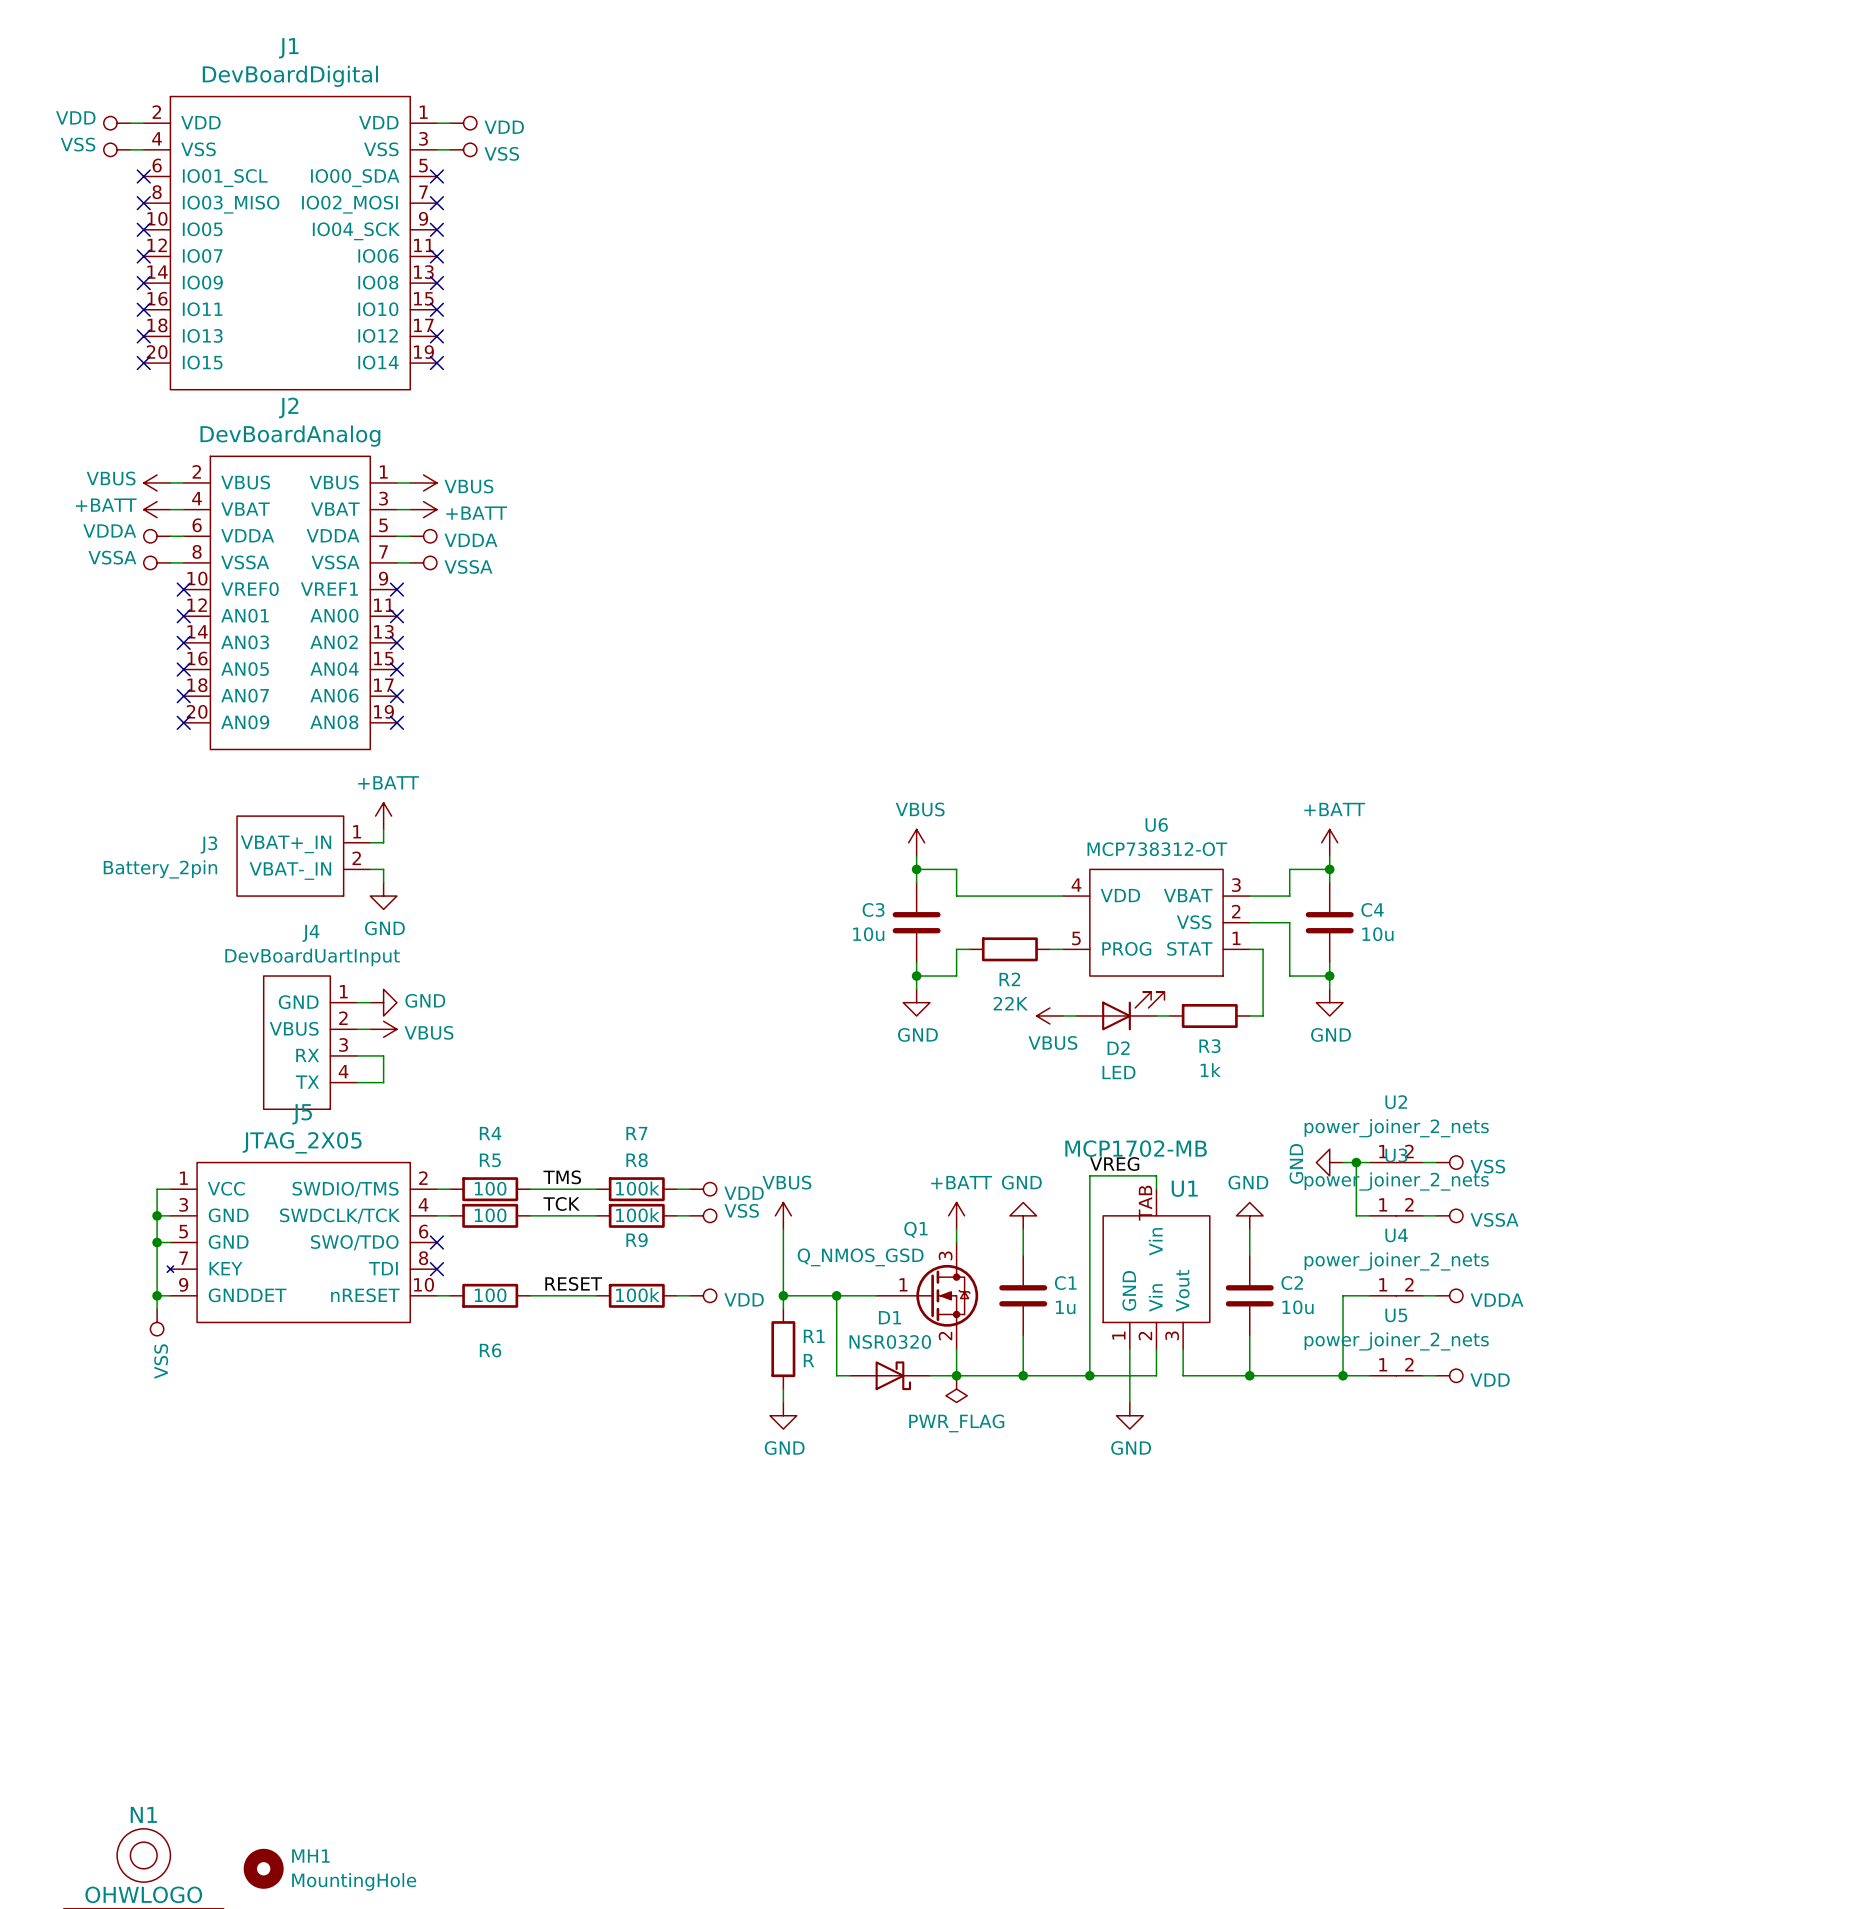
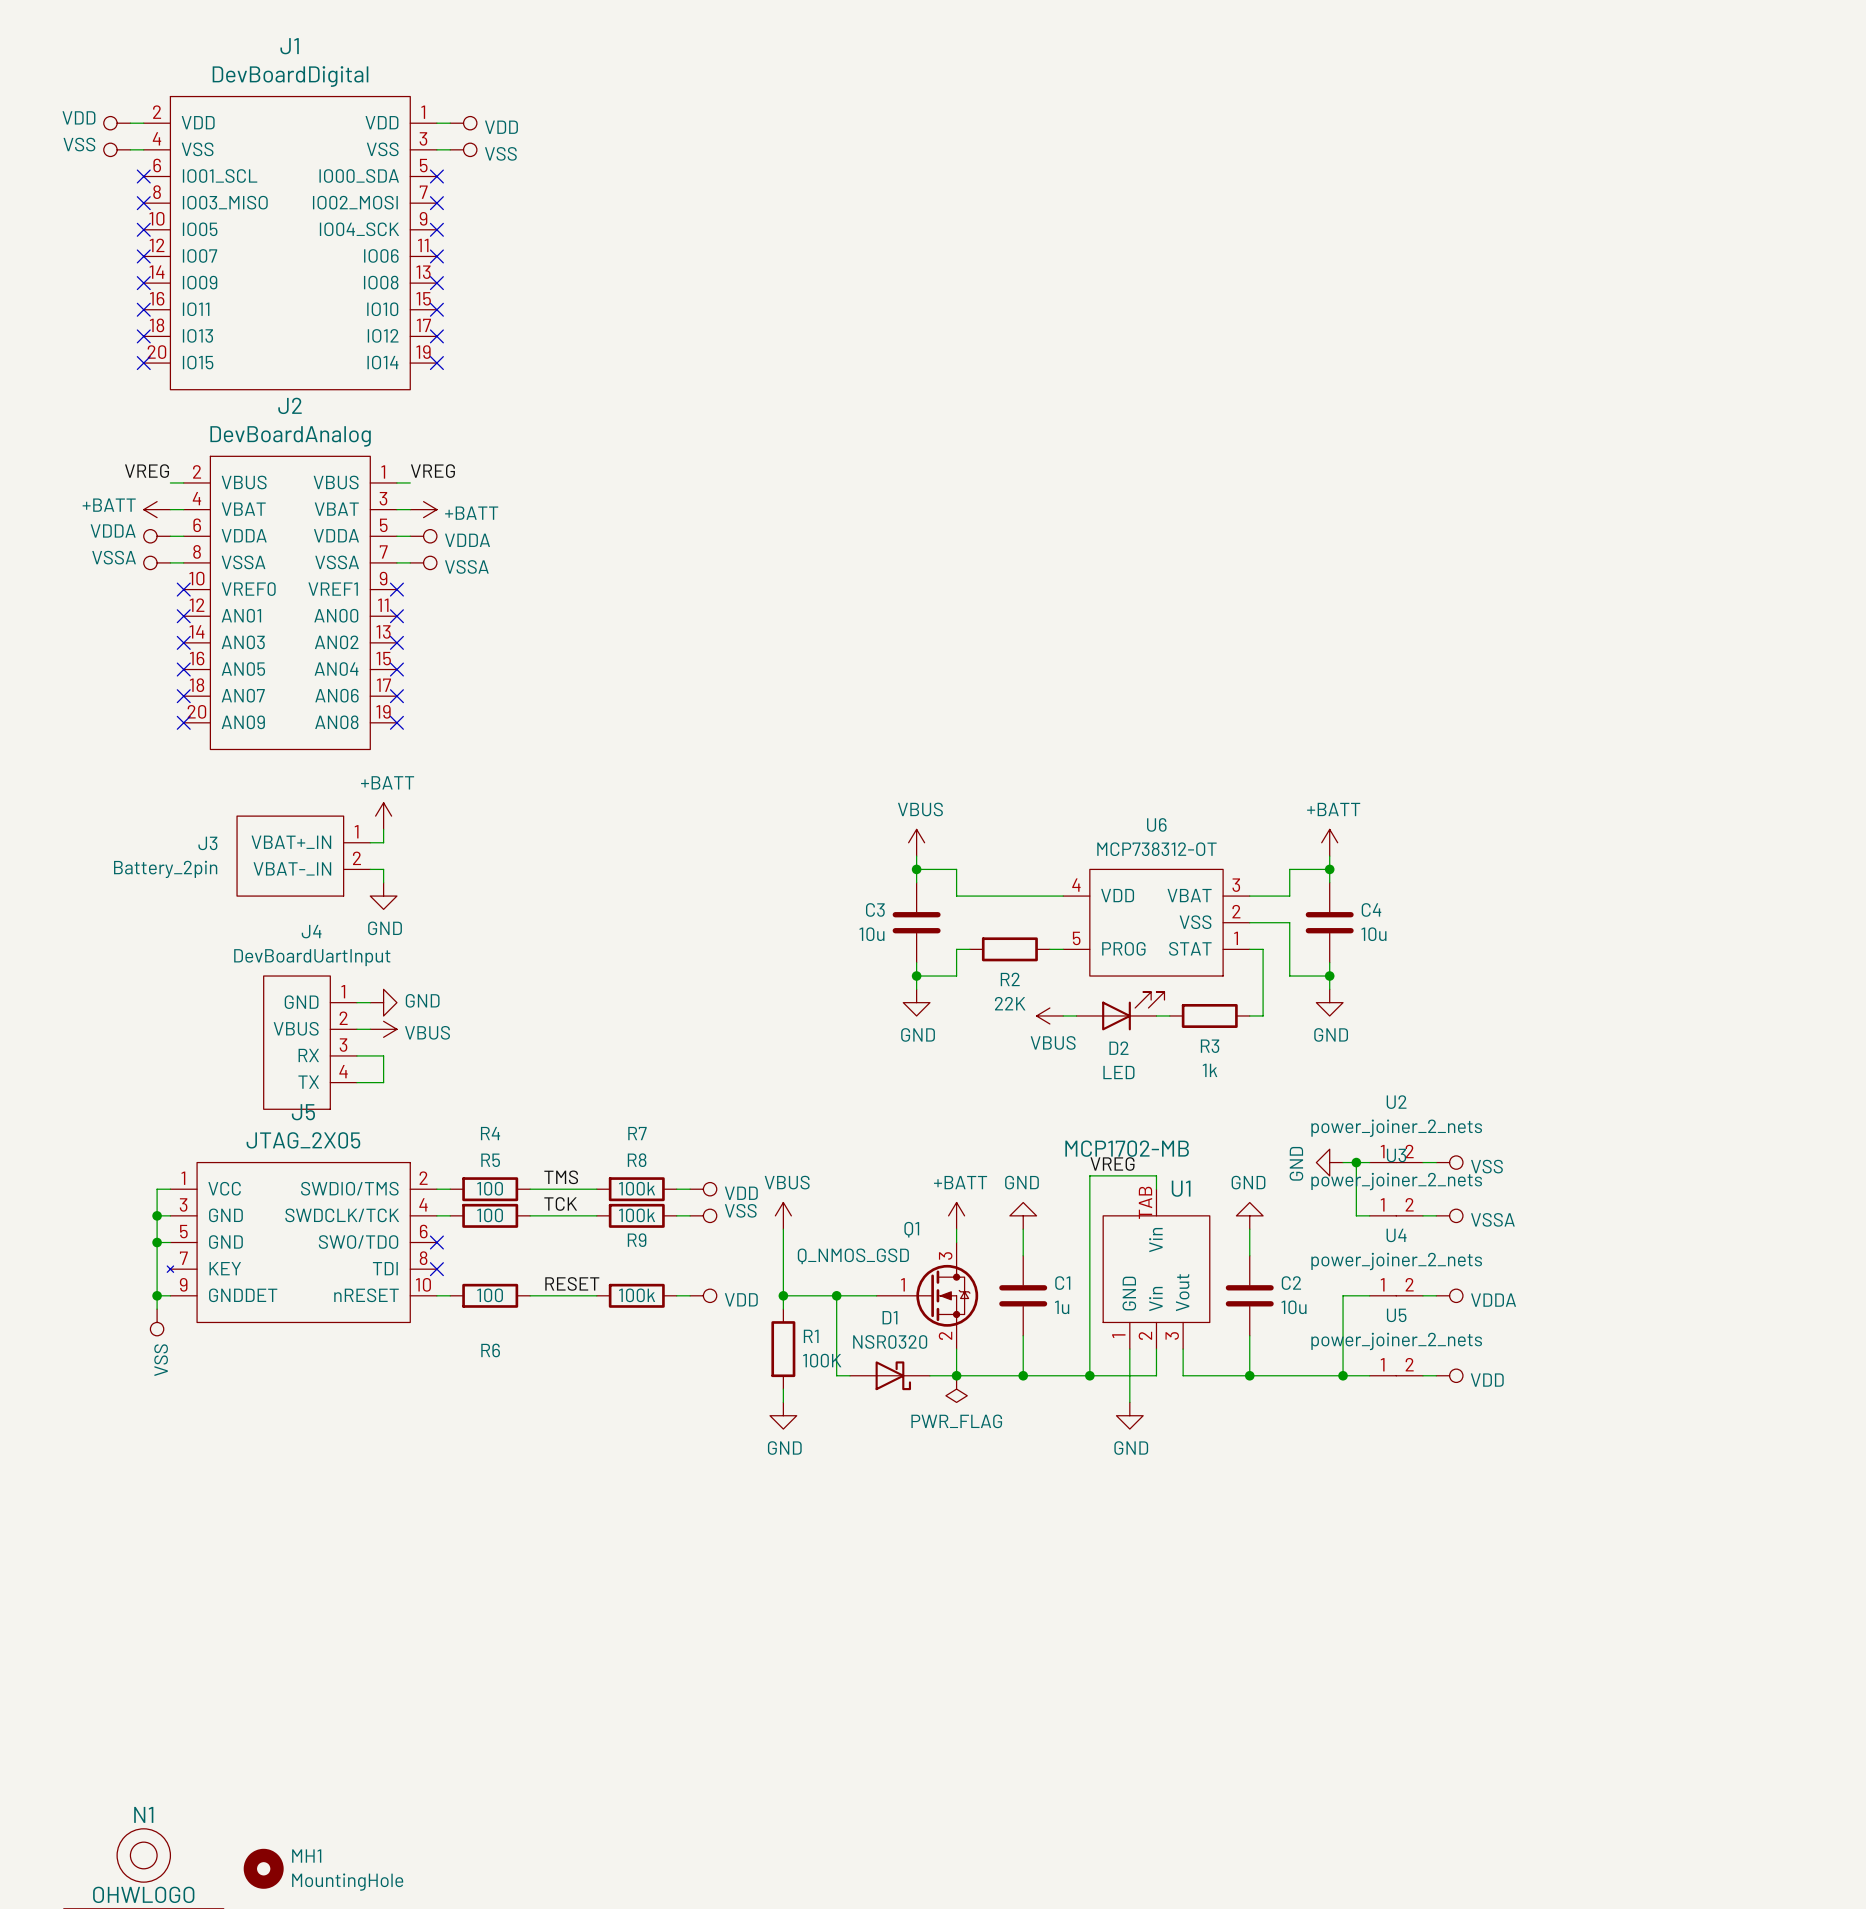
label: none -> VREG (147, 471)
label: none -> VREG (432, 471)
power symbol: VBUS (157, 482) -> none
power symbol: VBUS (423, 482) -> none
R1 value: R (809, 1360) -> 100K (822, 1360)

